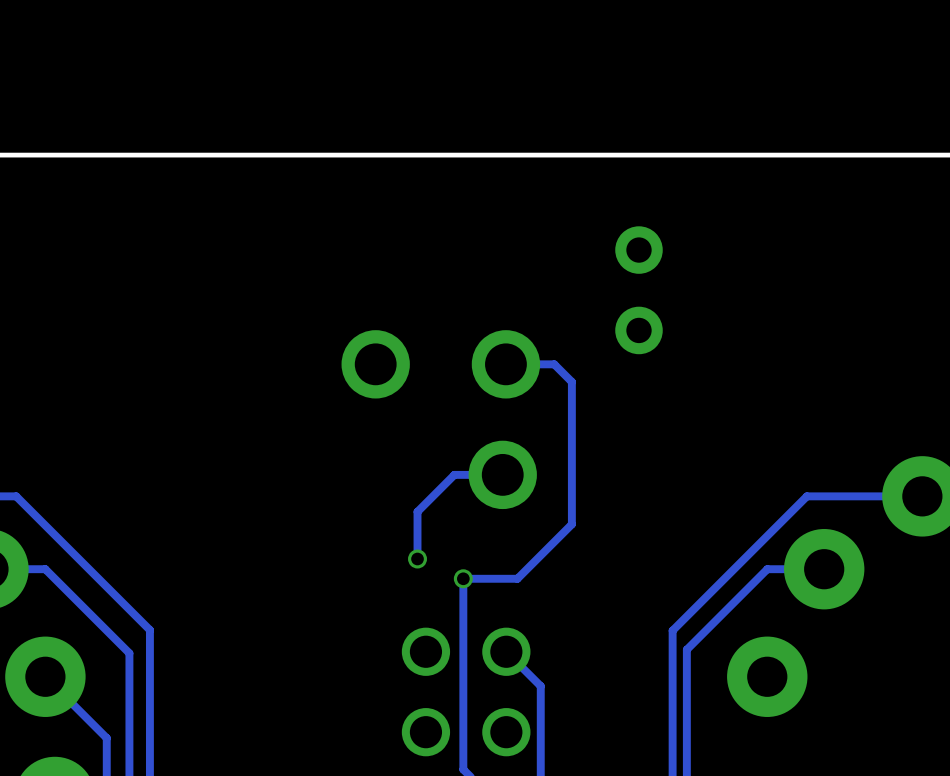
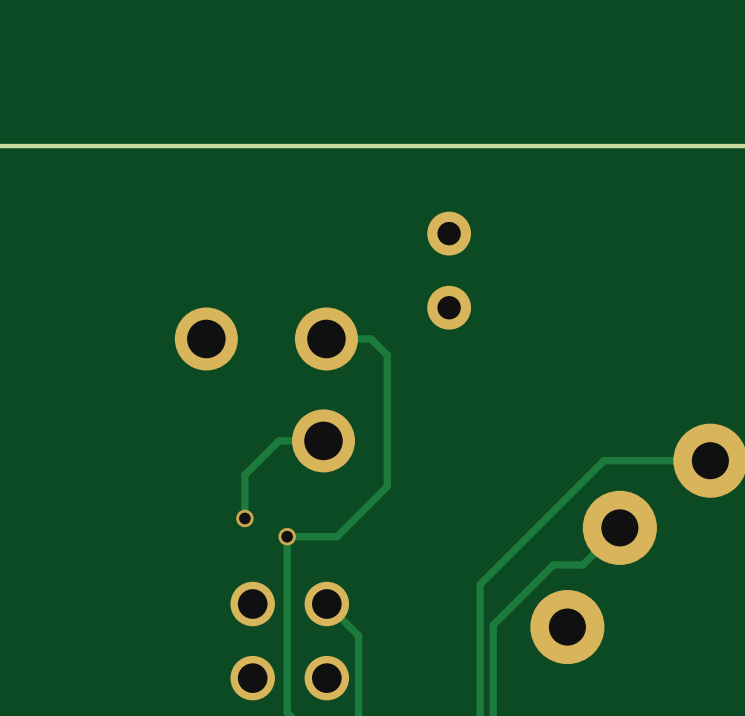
track: (824, 569) (767, 569) (686, 649) (686, 674) -> (619, 527) (582, 564) (553, 564) (493, 625)

